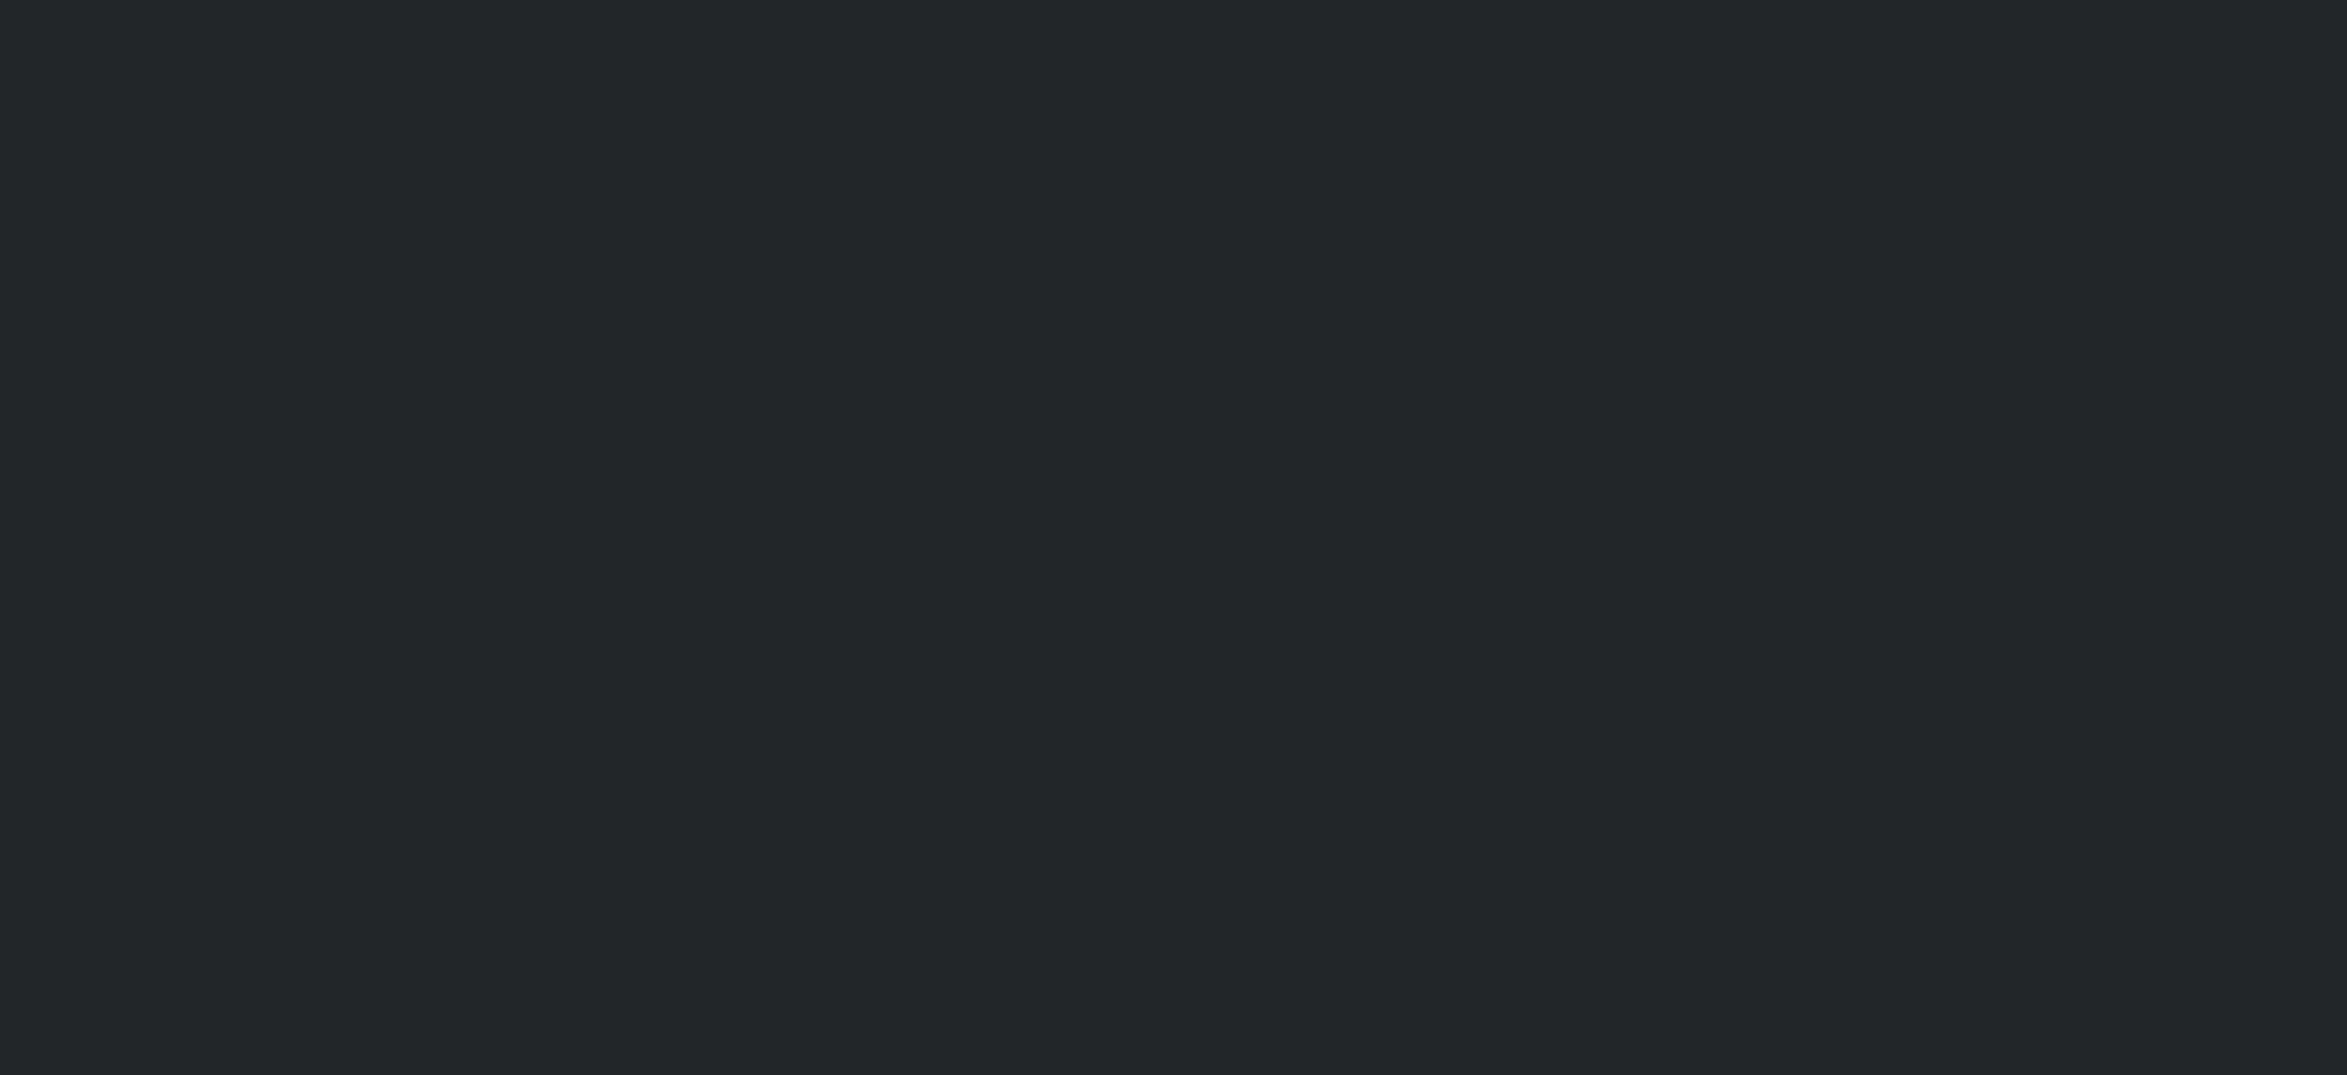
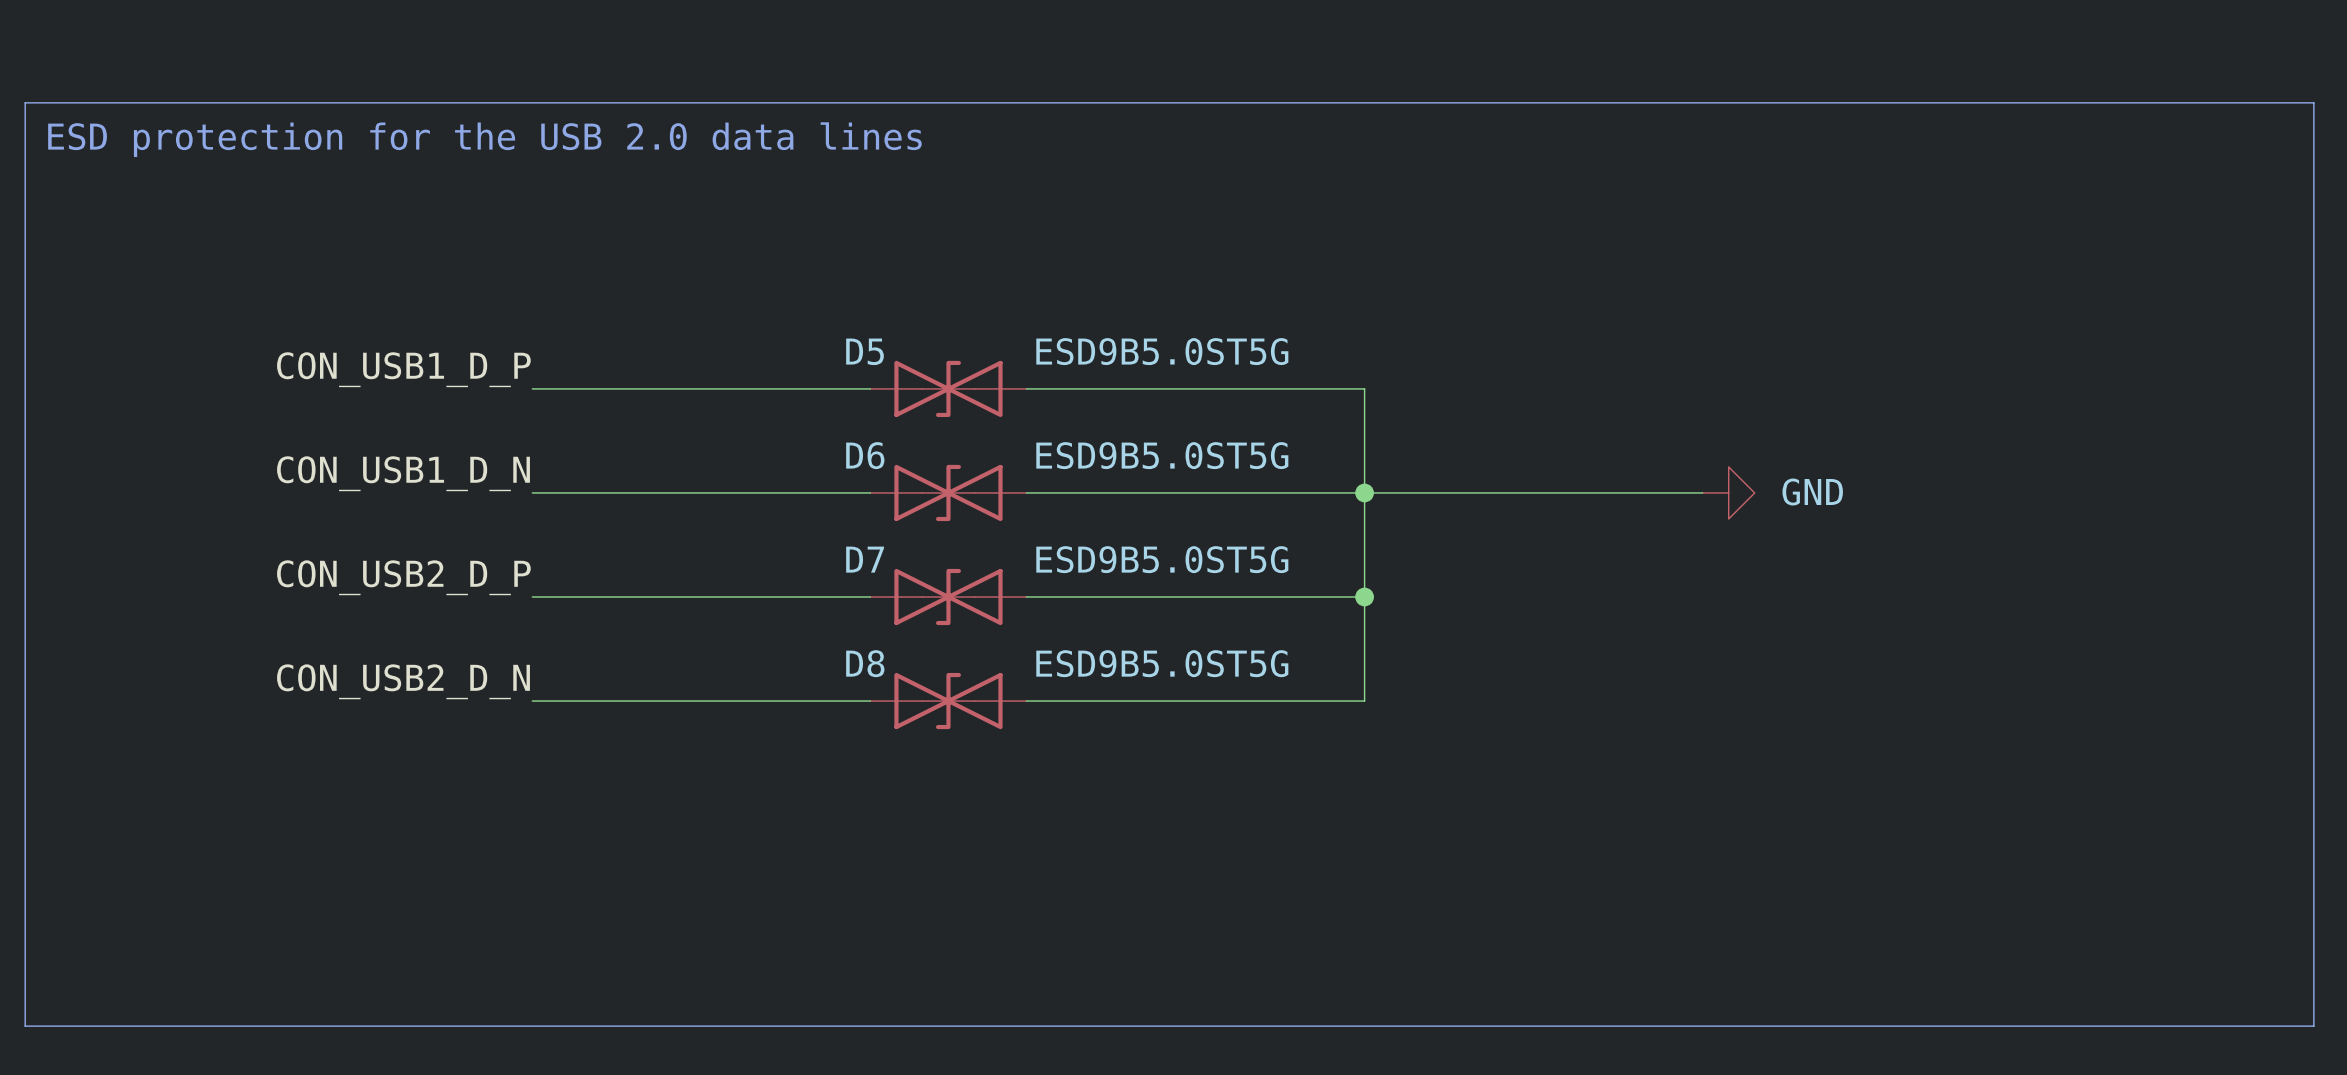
line: none -> (25, 102) (2313, 102) (2313, 1026) (25, 1026) (25, 102)
text: none -> ESD protection for the USB 2.0 data lines (484, 139)
label: none -> CON_USB1_D_P (403, 369)
wire: none -> (532, 388) (870, 388)
D5: none -> ESD9B5.0ST5G (948, 388)
wire: none -> (1026, 388) (1364, 388) (1364, 701) (1026, 701)
label: none -> CON_USB1_D_N (403, 473)
wire: none -> (532, 492) (870, 492)
D6: none -> ESD9B5.0ST5G (948, 492)
wire: none -> (1026, 492) (1702, 492)
junction: none -> (1364, 492)
power symbol: none -> GND (1728, 492)
label: none -> CON_USB2_D_P (403, 577)
wire: none -> (532, 597) (870, 597)
D7: none -> ESD9B5.0ST5G (948, 597)
wire: none -> (1026, 597) (1364, 597)
junction: none -> (1364, 597)
label: none -> CON_USB2_D_N (403, 681)
wire: none -> (532, 701) (870, 701)
D8: none -> ESD9B5.0ST5G (948, 701)

